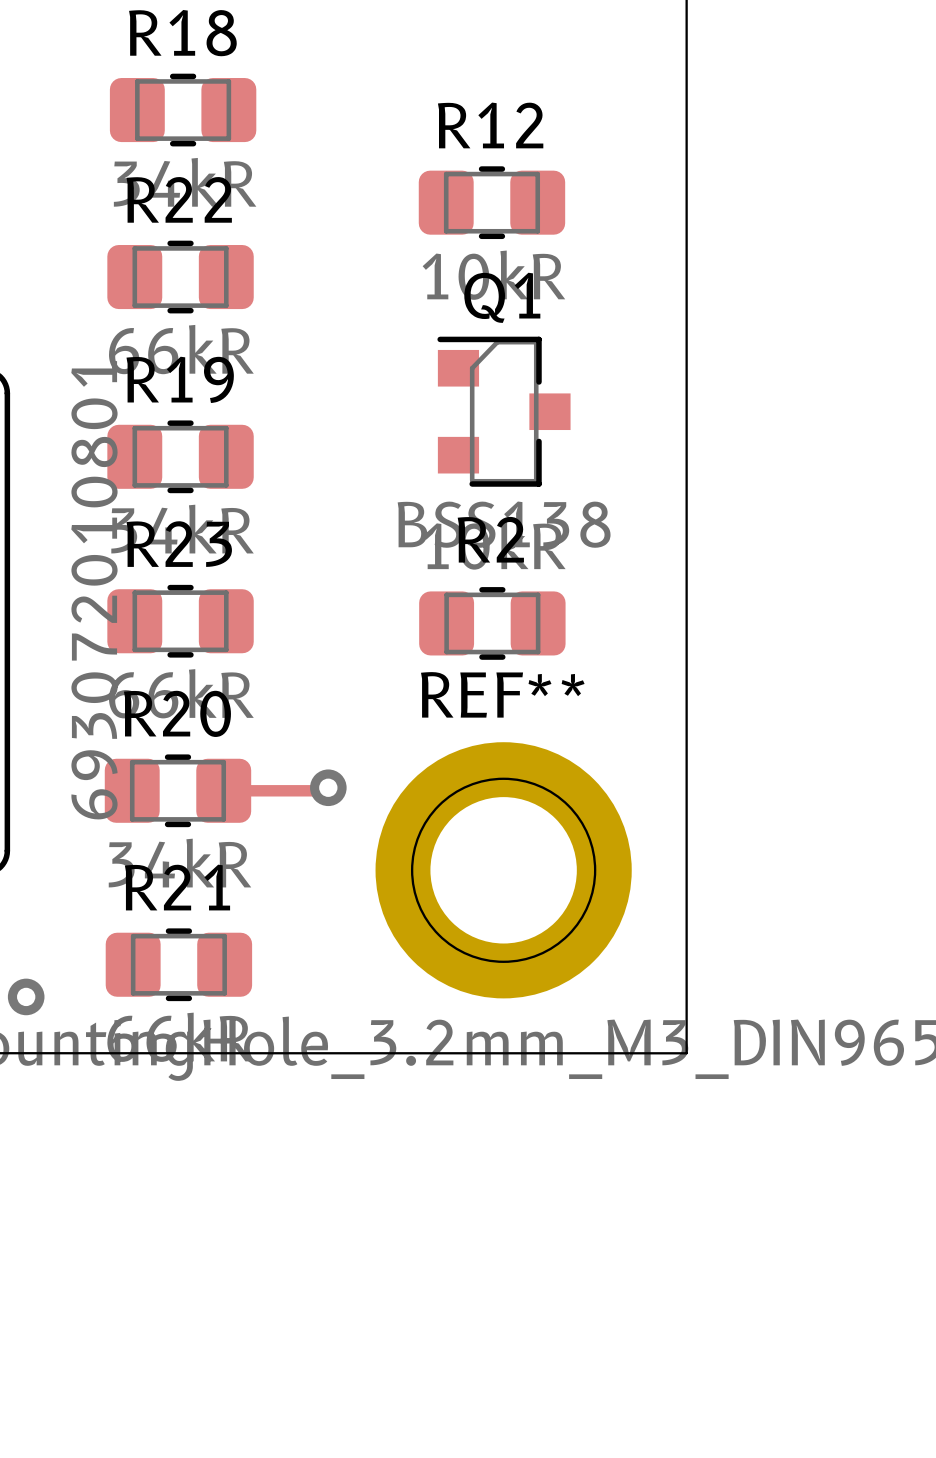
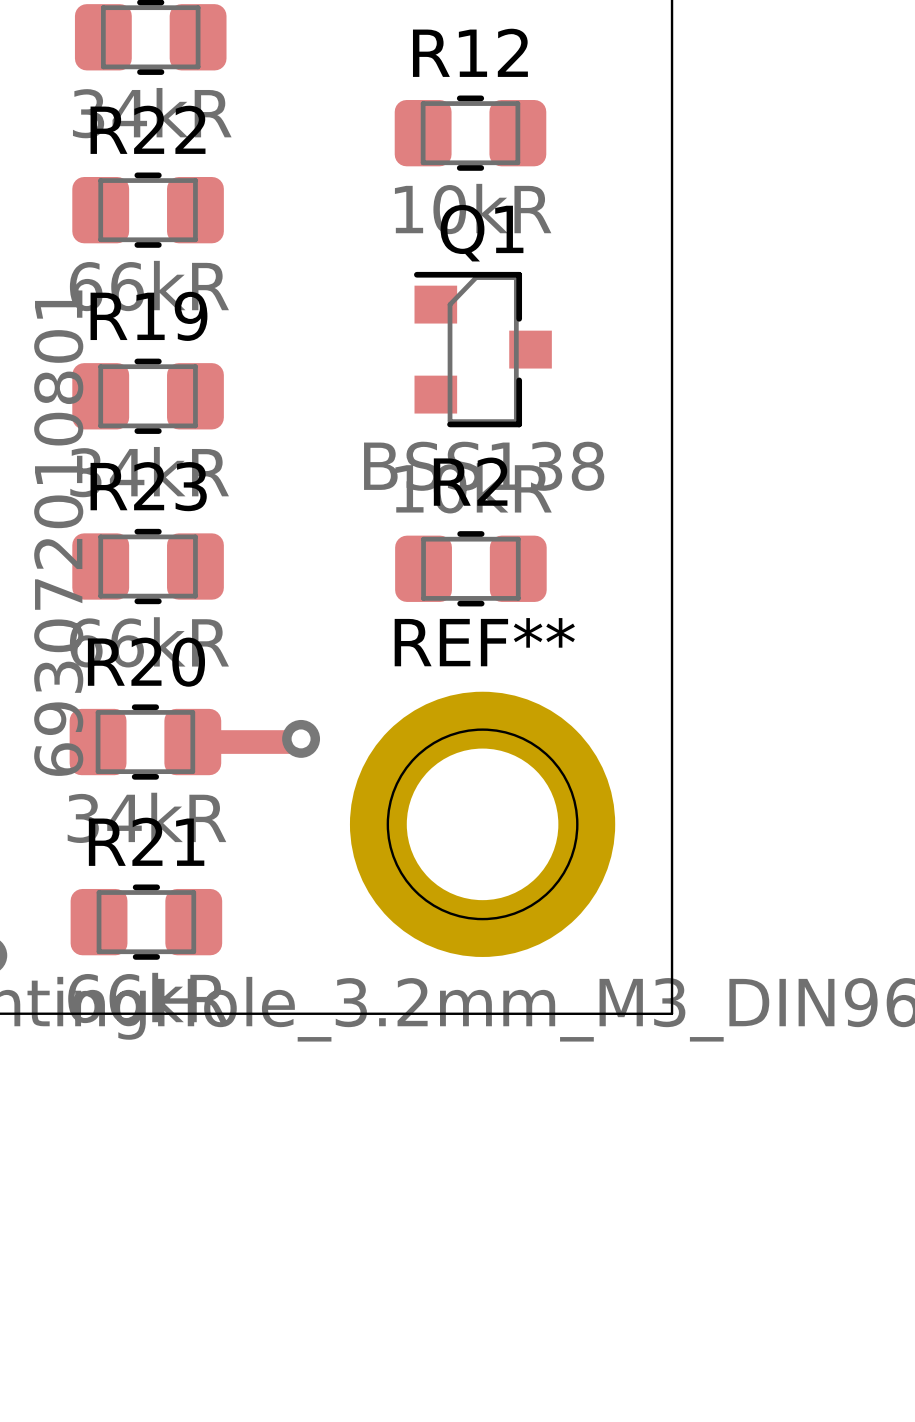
track width: thin (223, 790) (325, 790) -> thick (192, 742) (297, 742)

